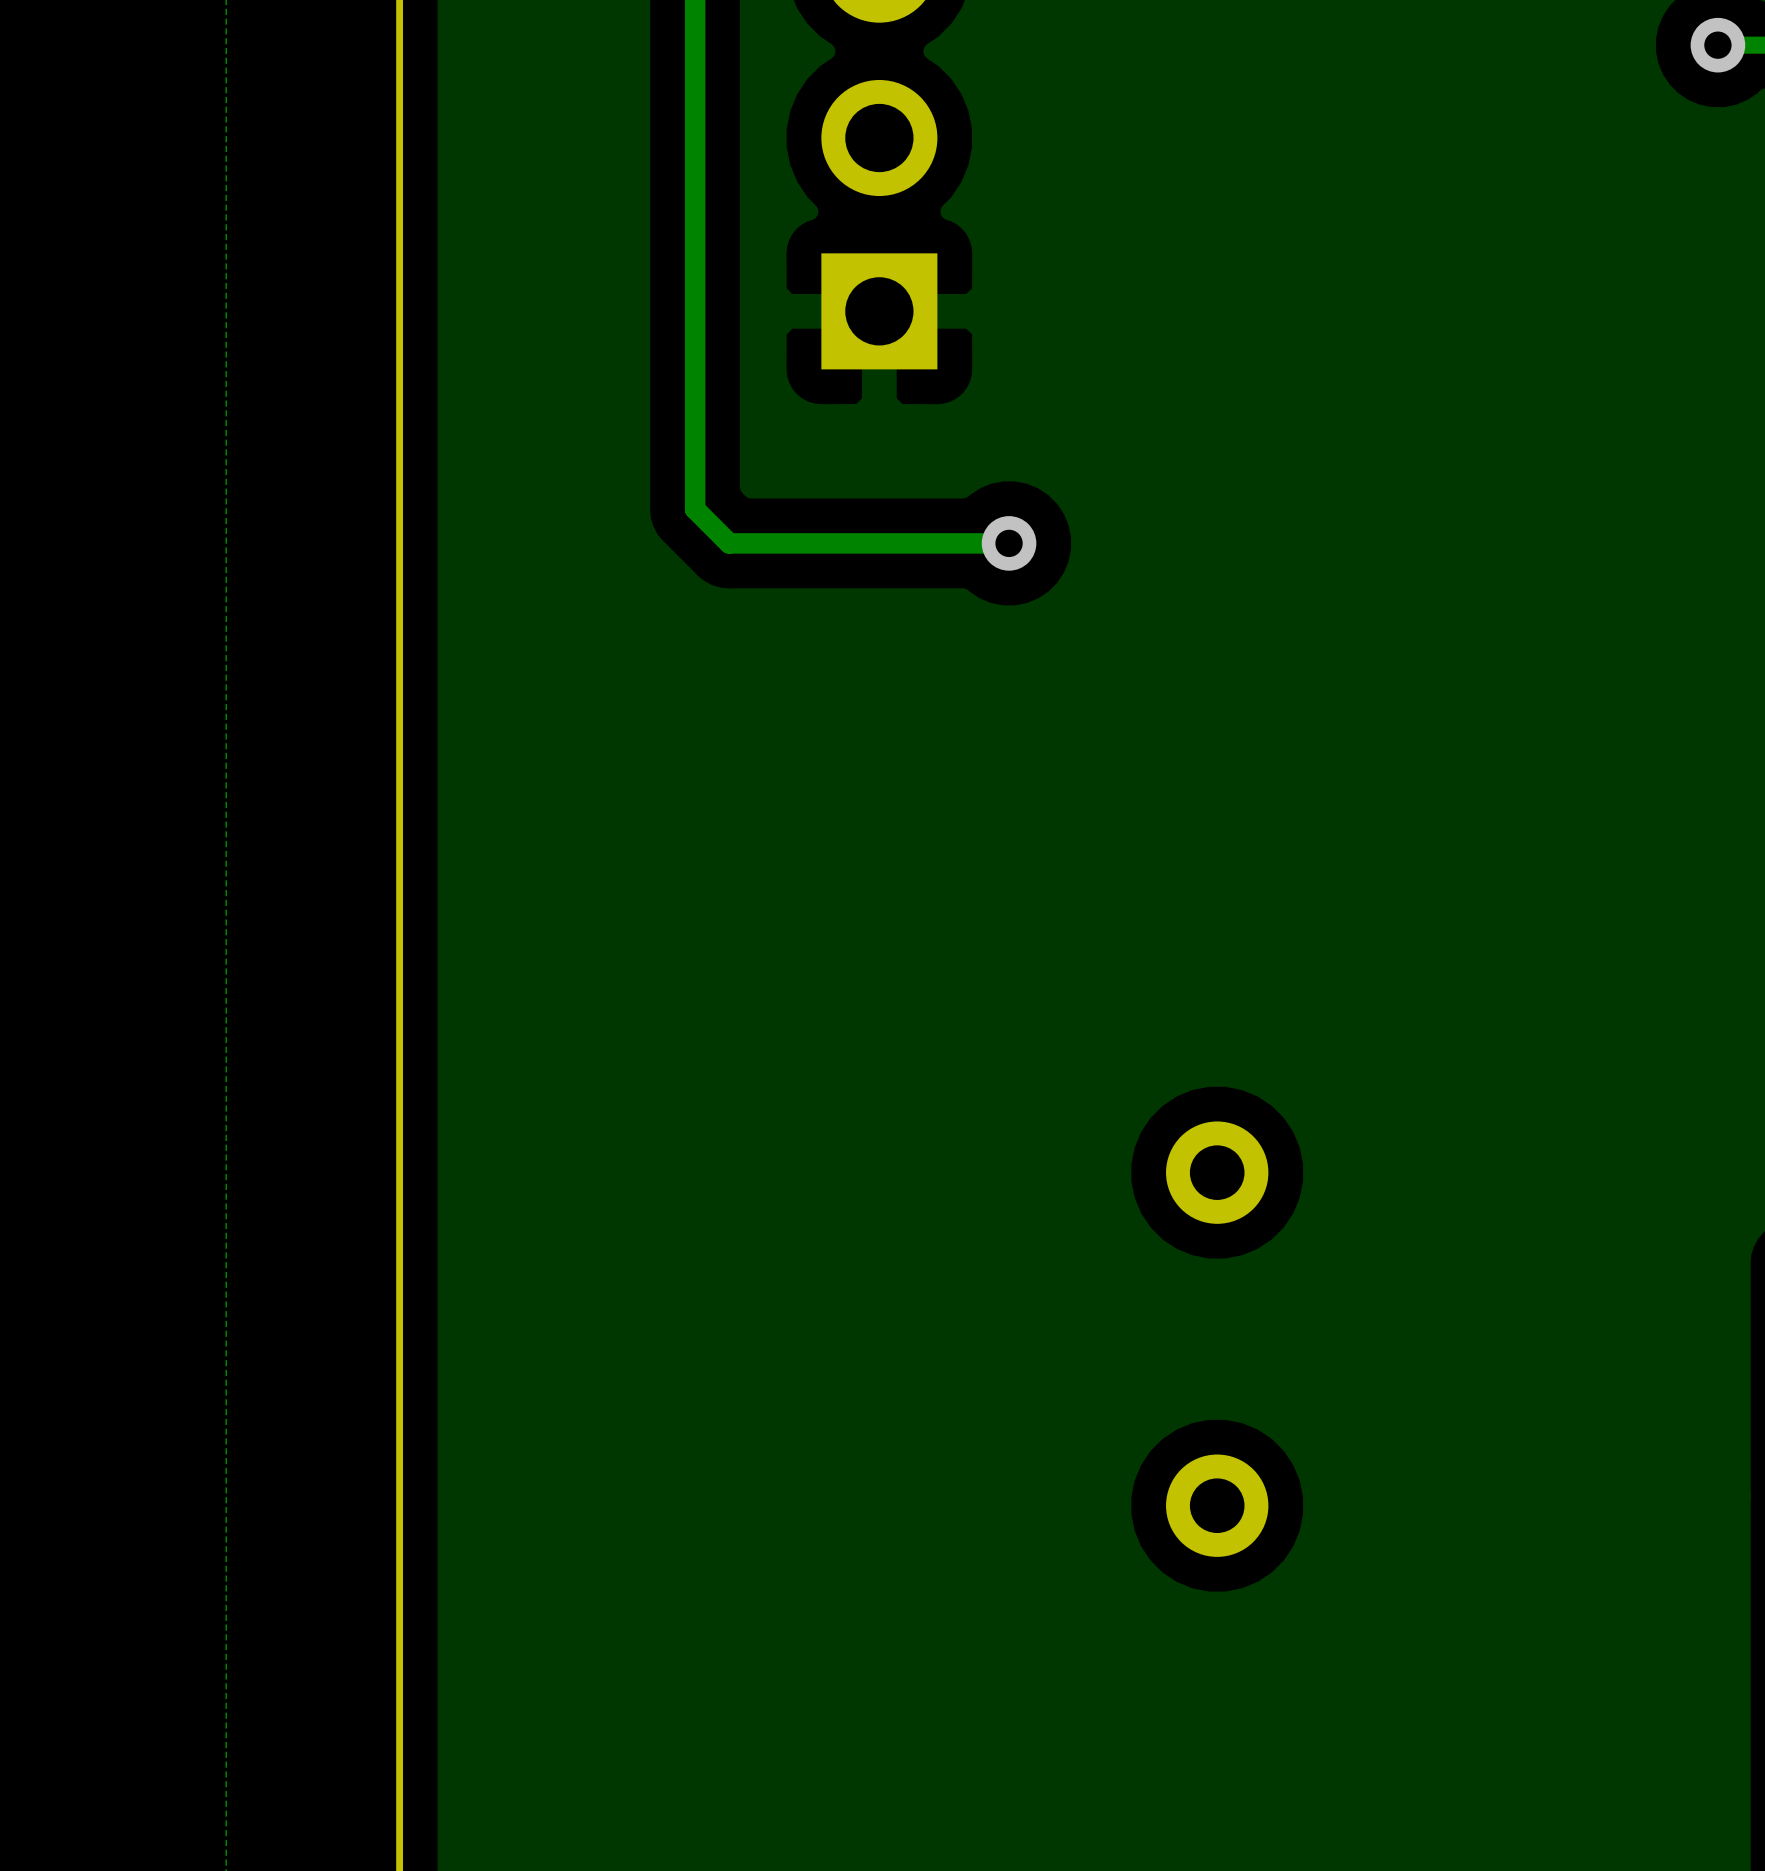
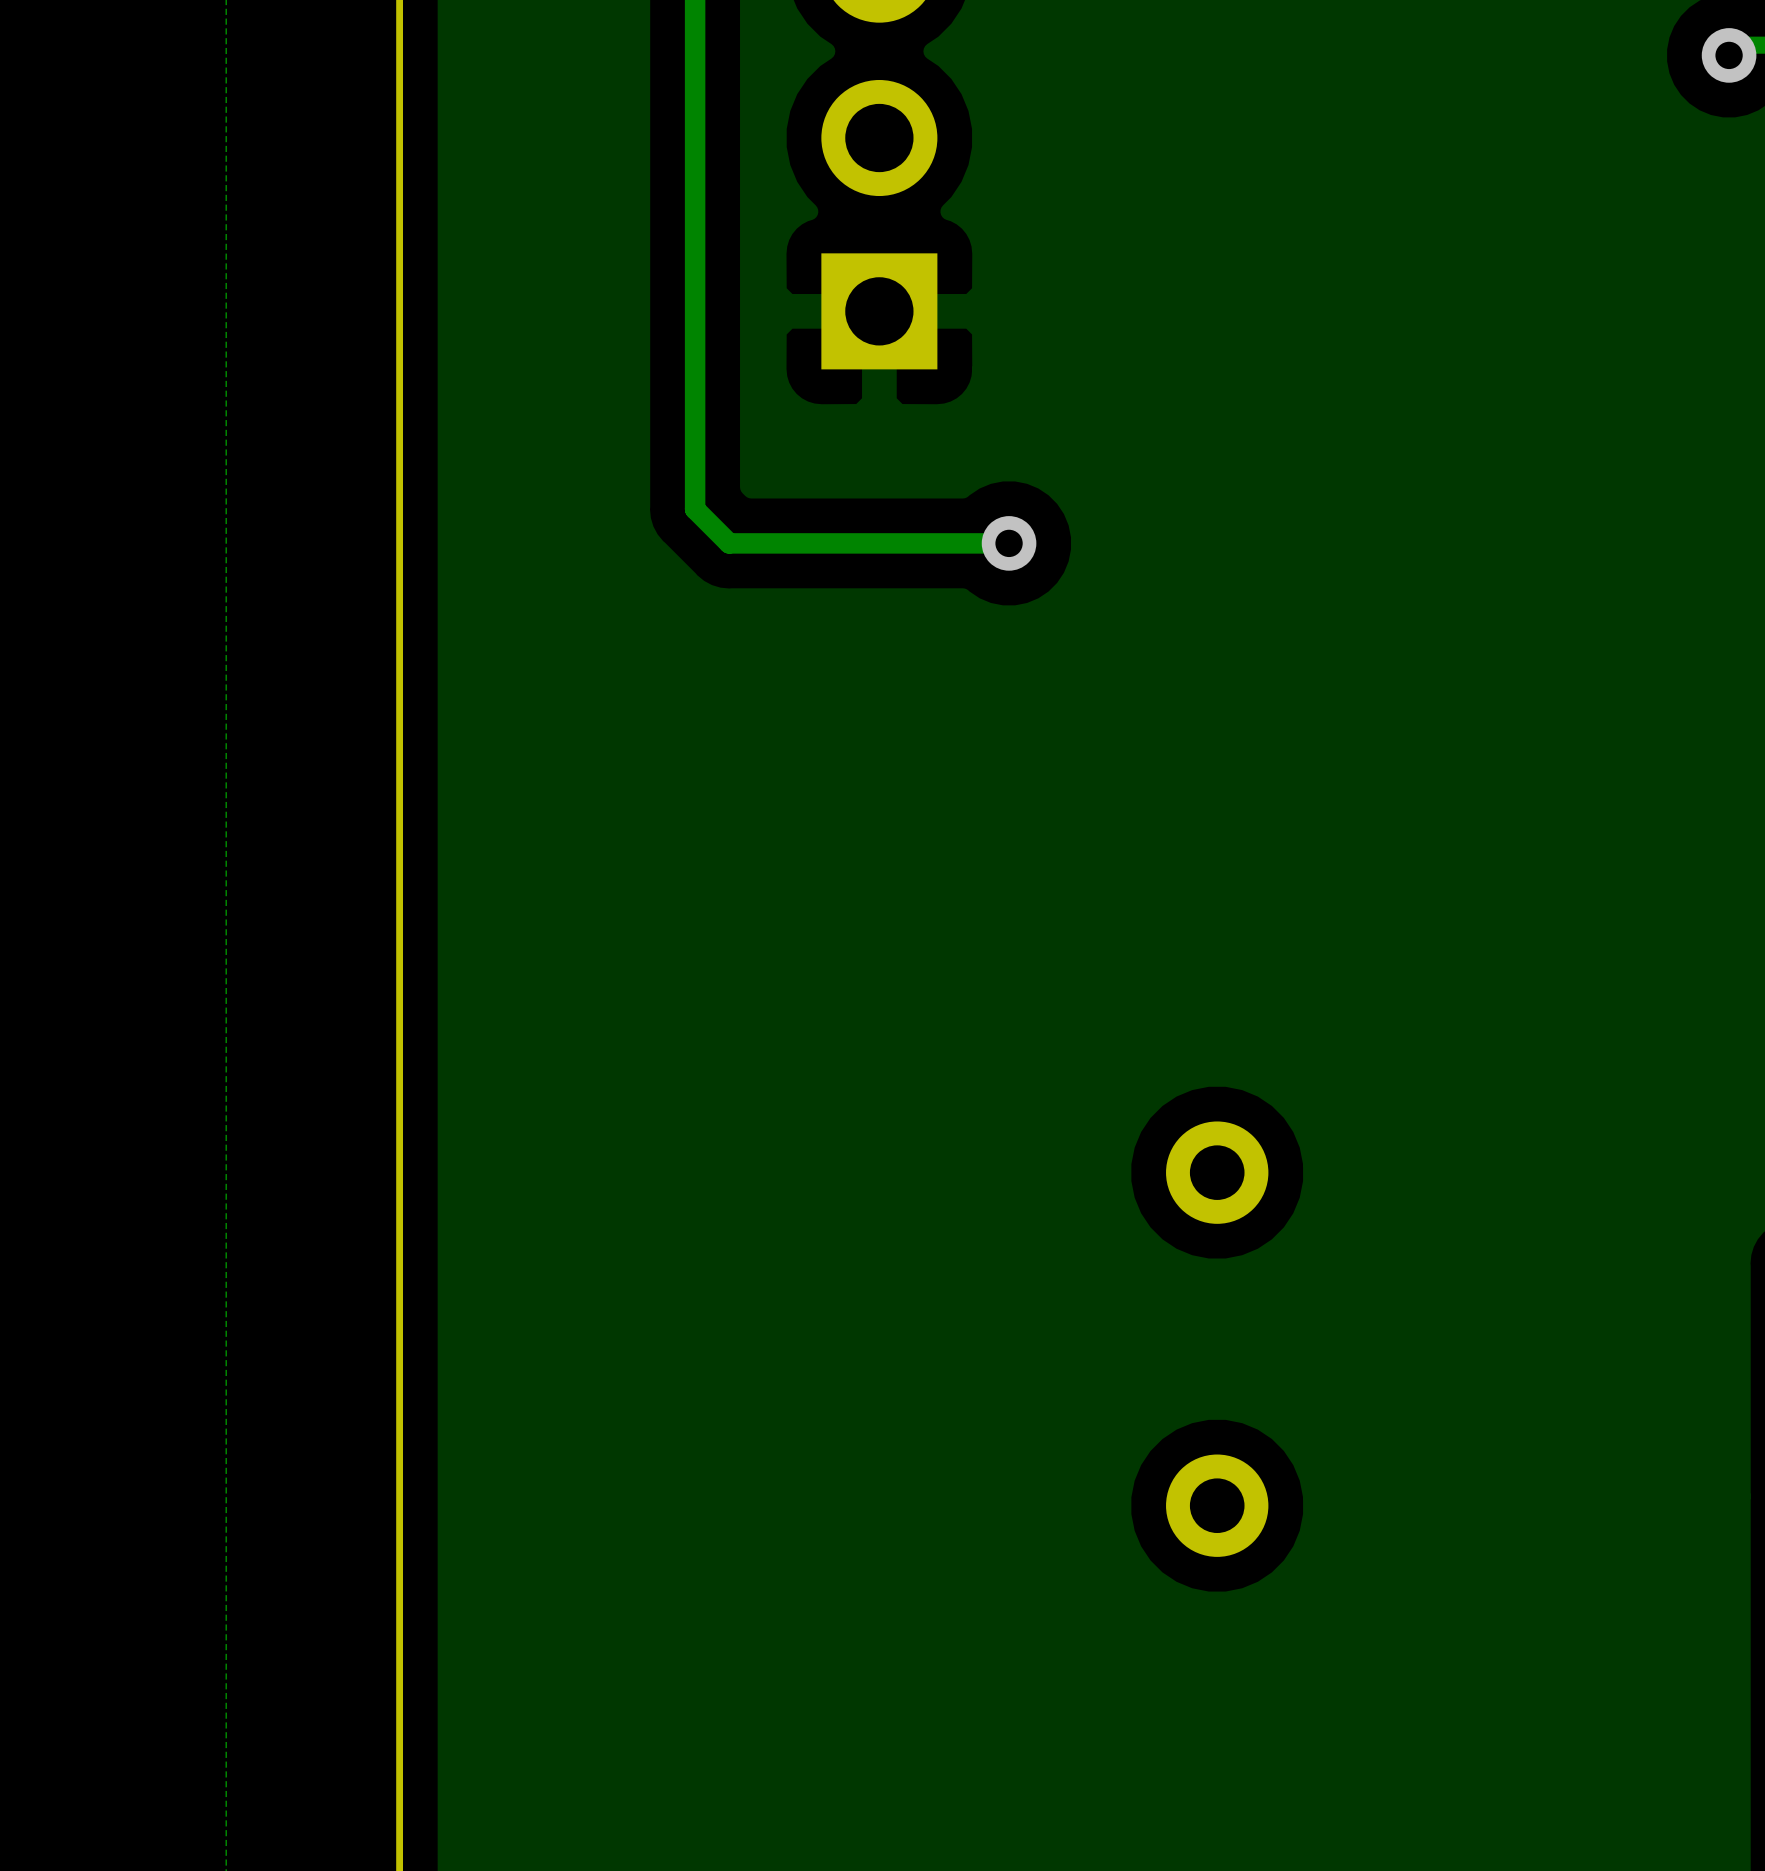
via position: (1717, 45) -> (1729, 55)

